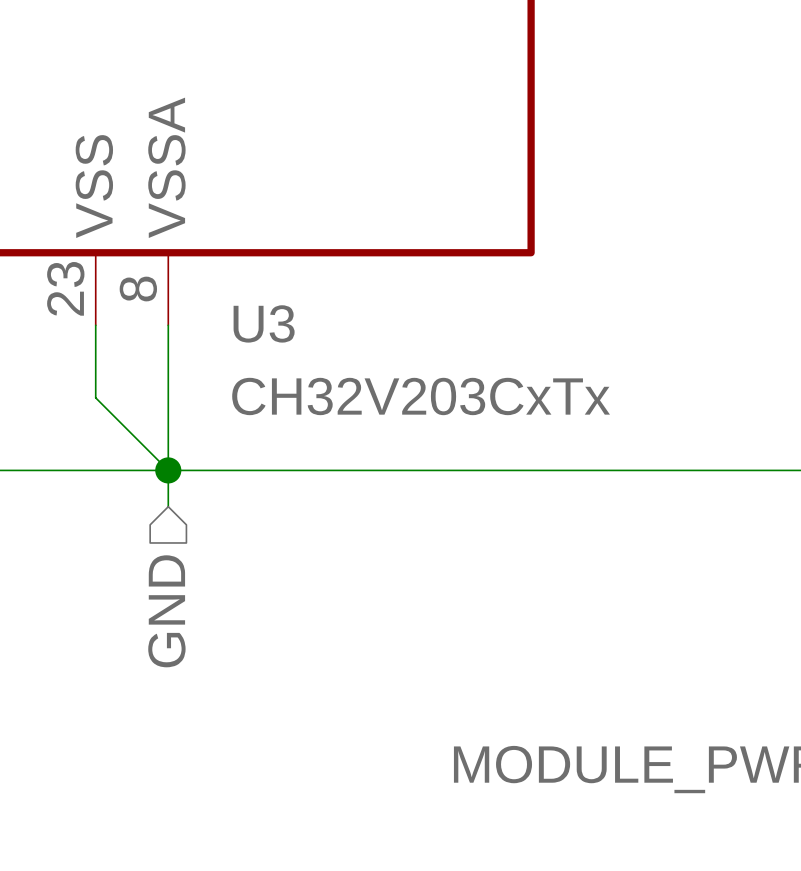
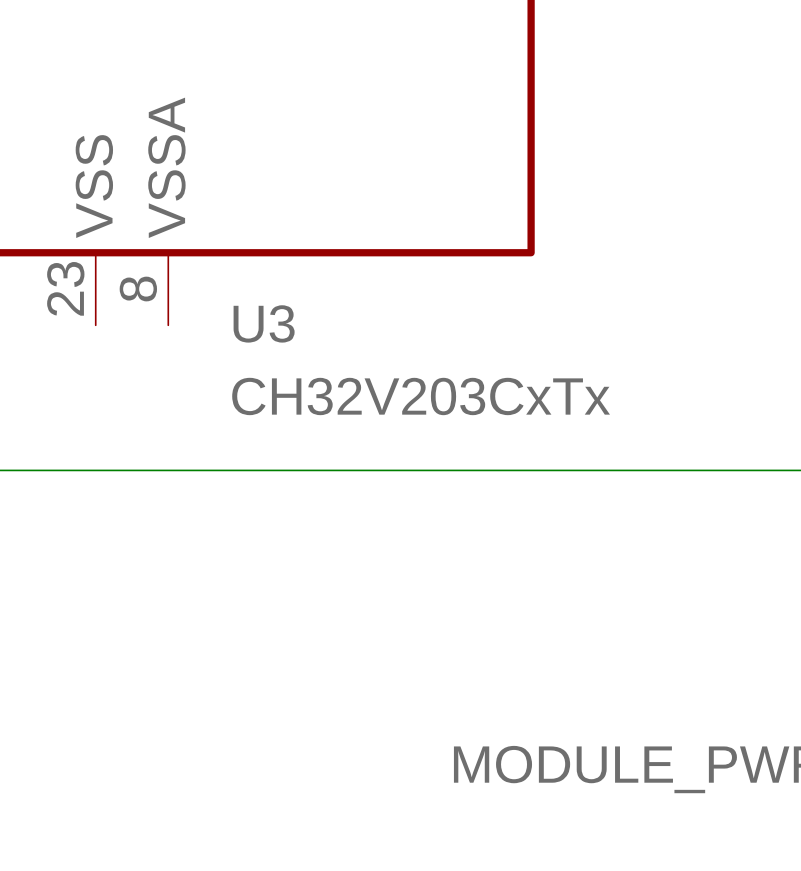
wire: (95, 325) (95, 397) (168, 470) -> none
wire: (168, 325) (168, 506) -> none
junction: (168, 470) -> none
hierarchical label: GND (166, 611) -> none

